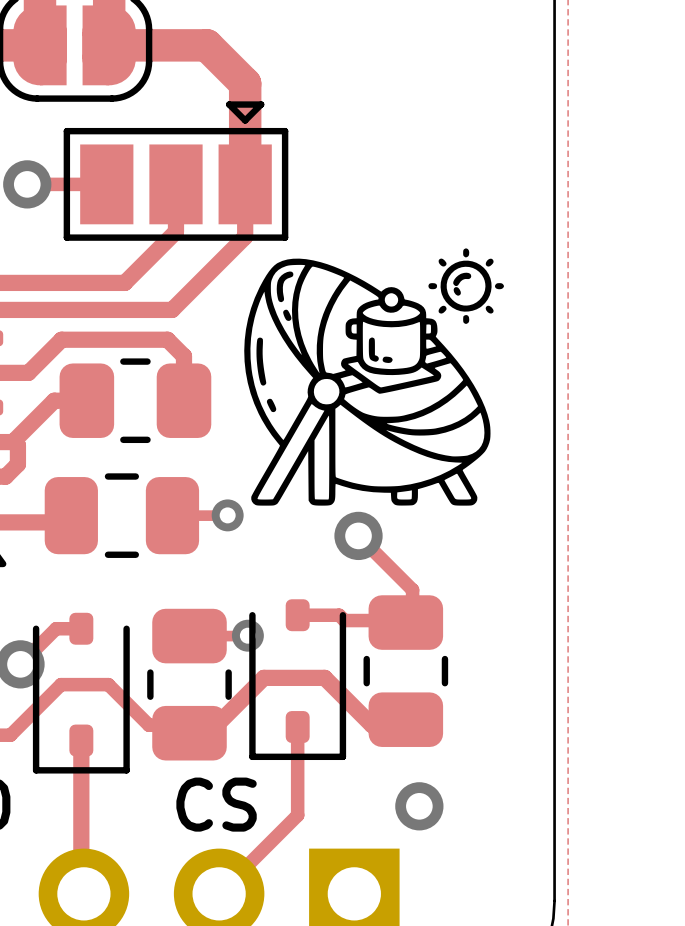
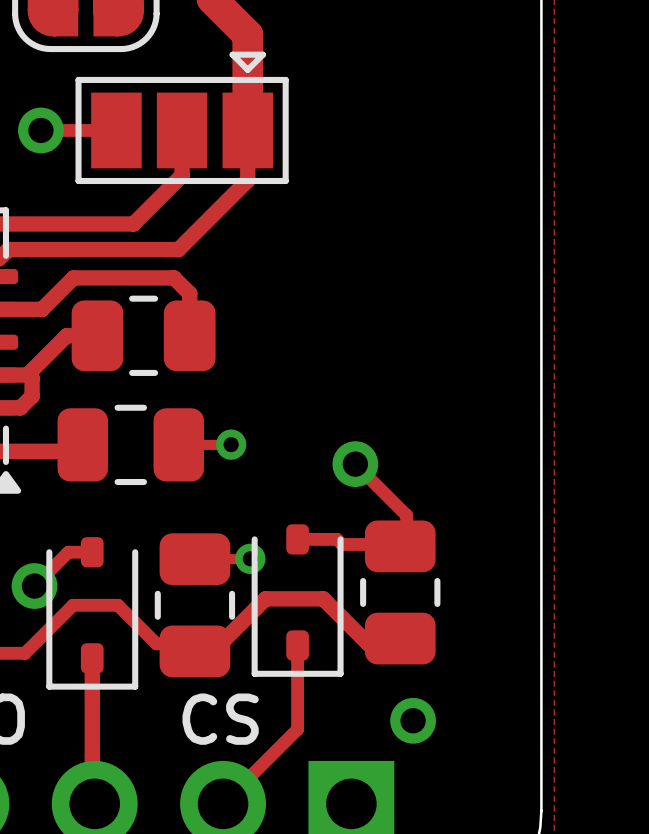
drawing: [244, 248, 504, 506] -> none

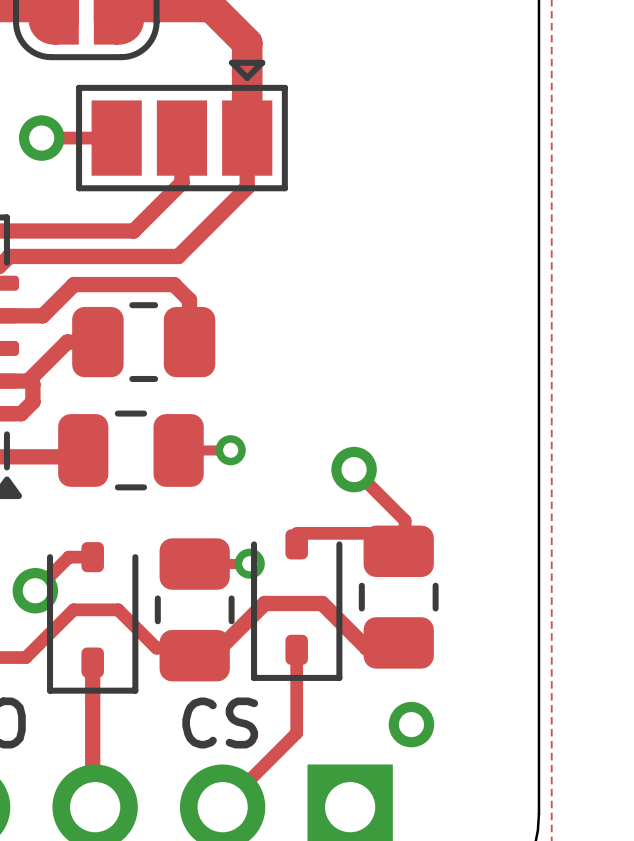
track: none -> (296, 533) (382, 533)
track: (297, 539) (337, 539) (342, 544) (400, 544) -> none

